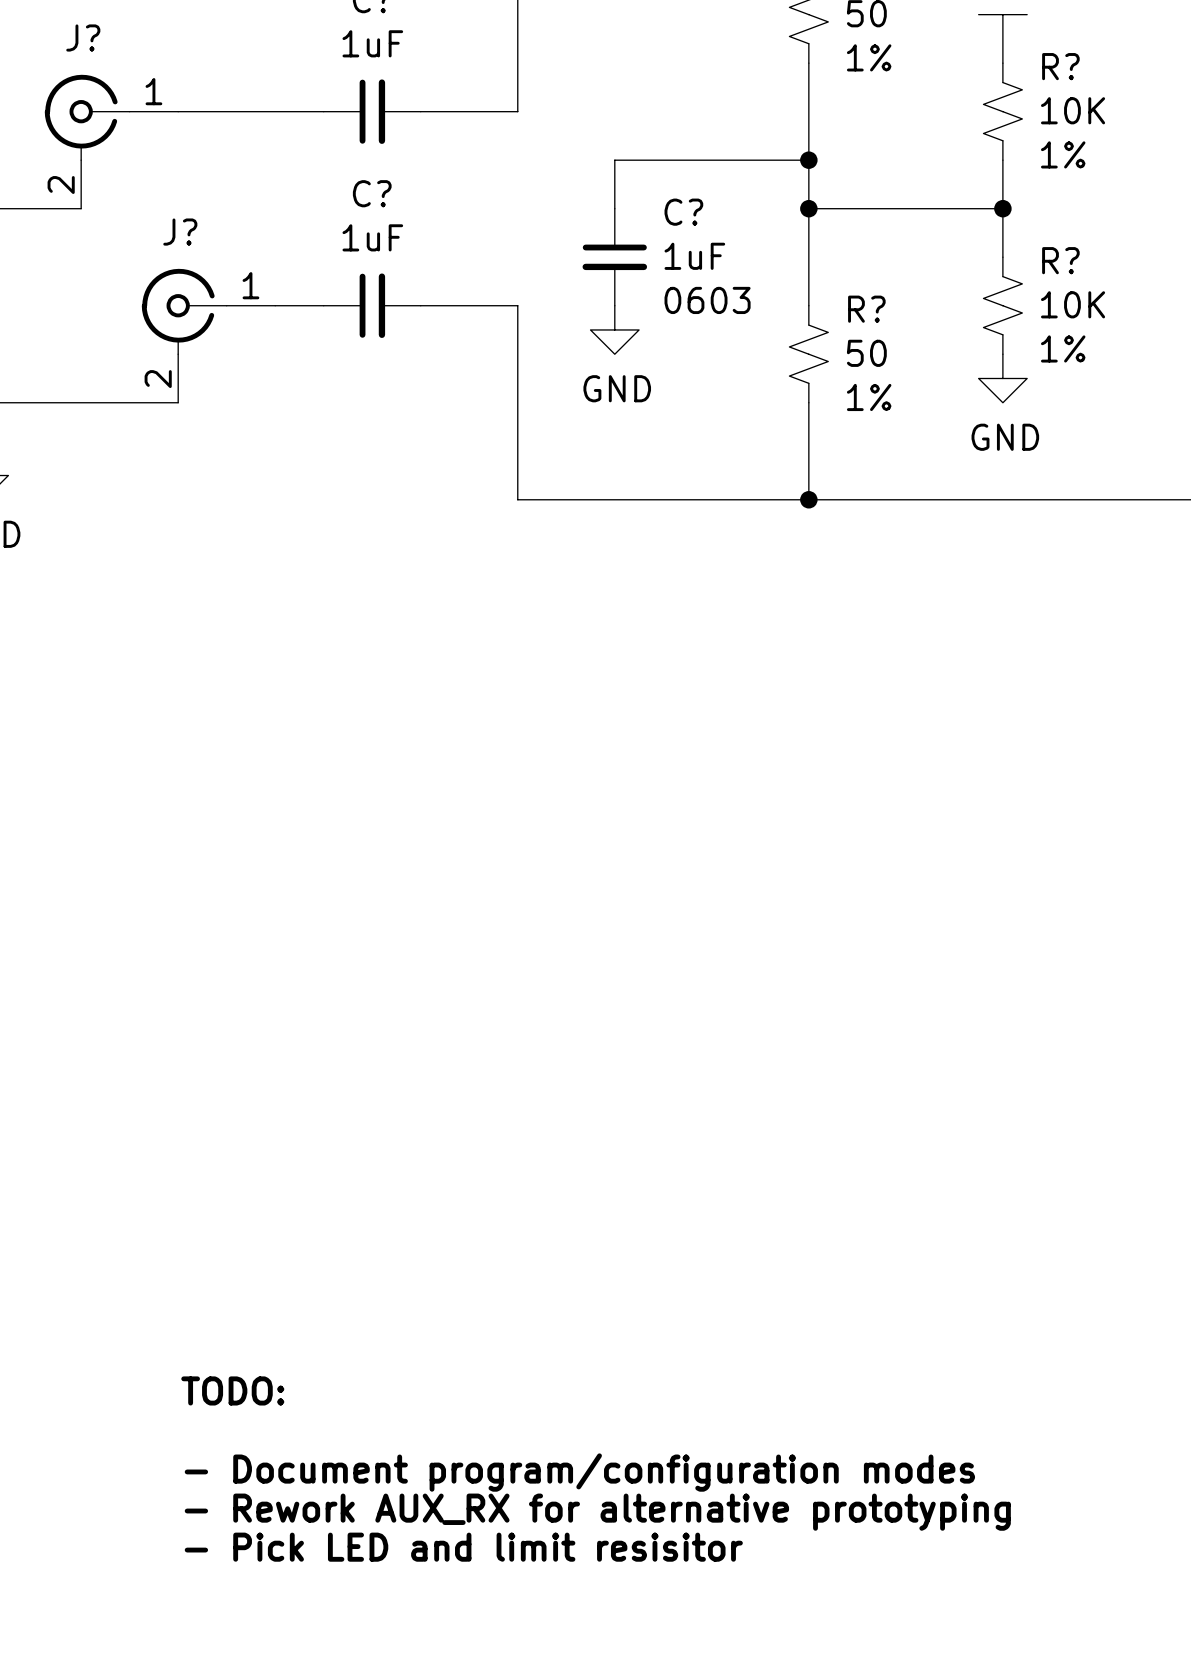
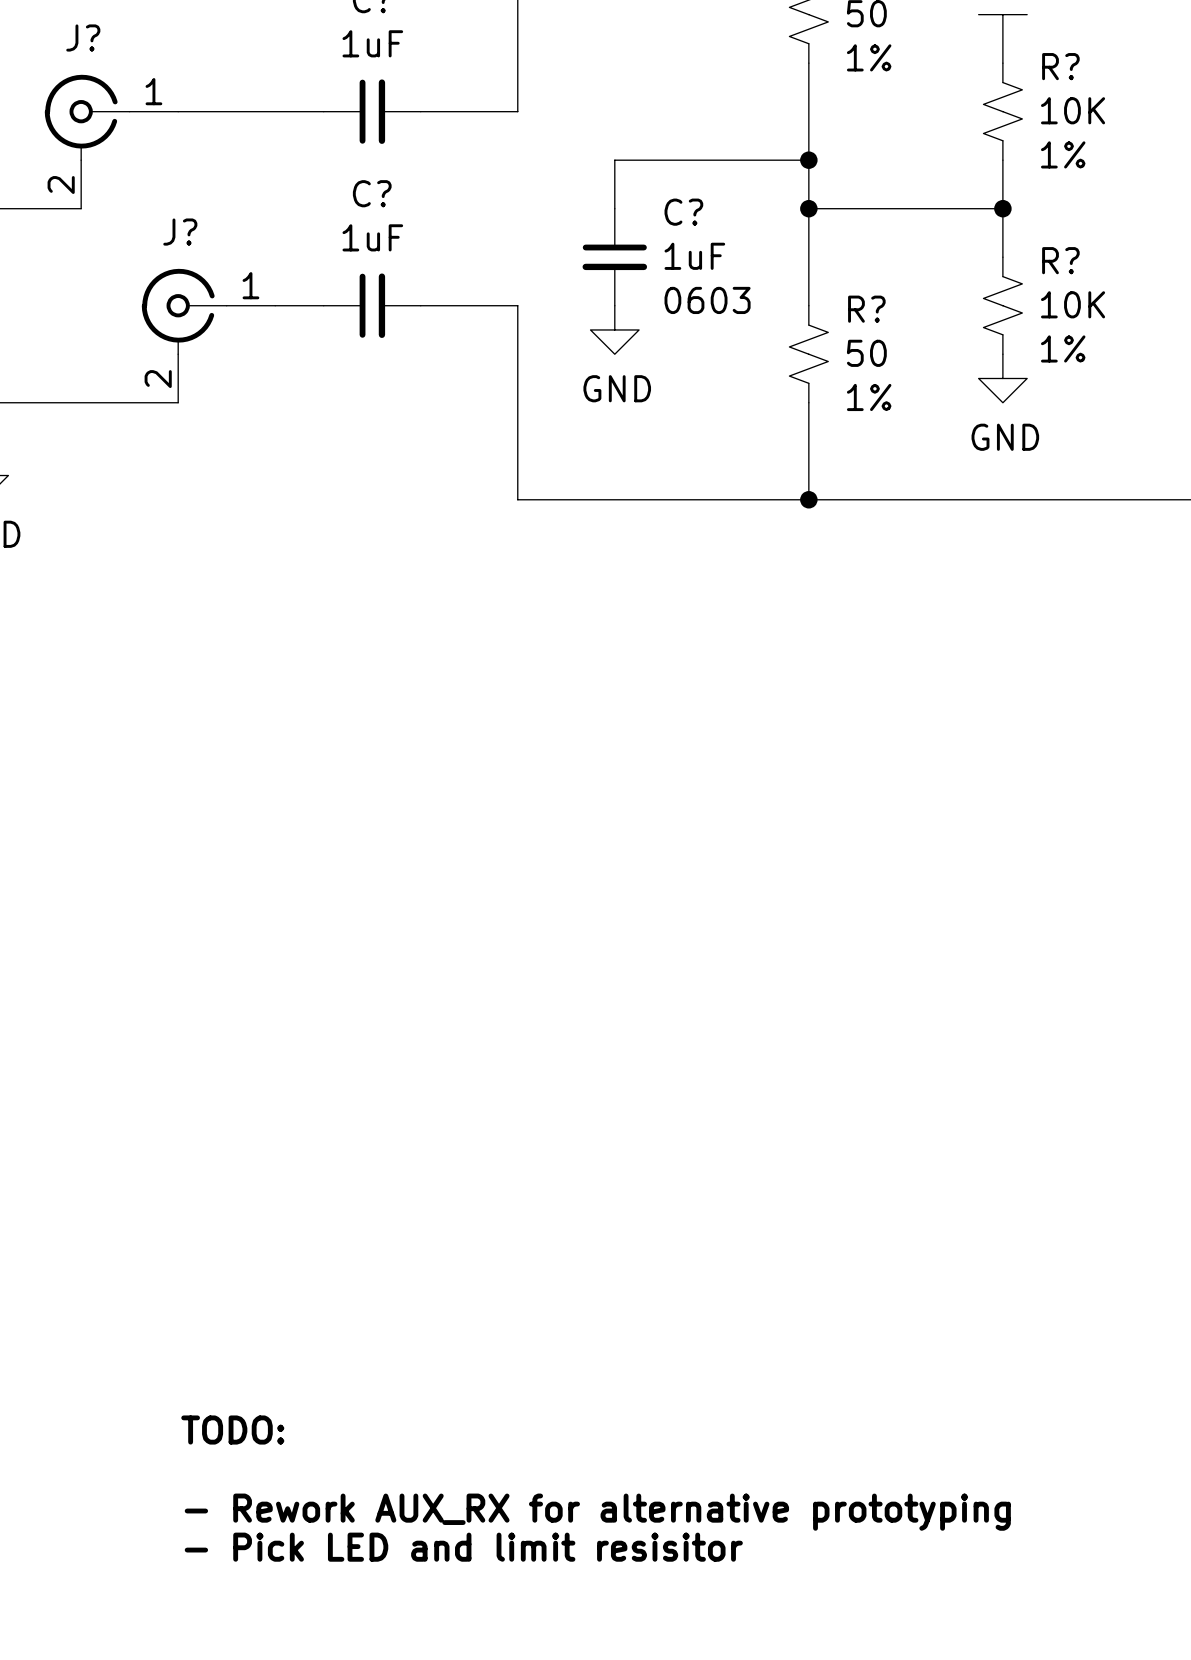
text position: TODO: (232, 1390) -> TODO: (232, 1430)
text: - Document program/configuration modes (579, 1472) -> none

